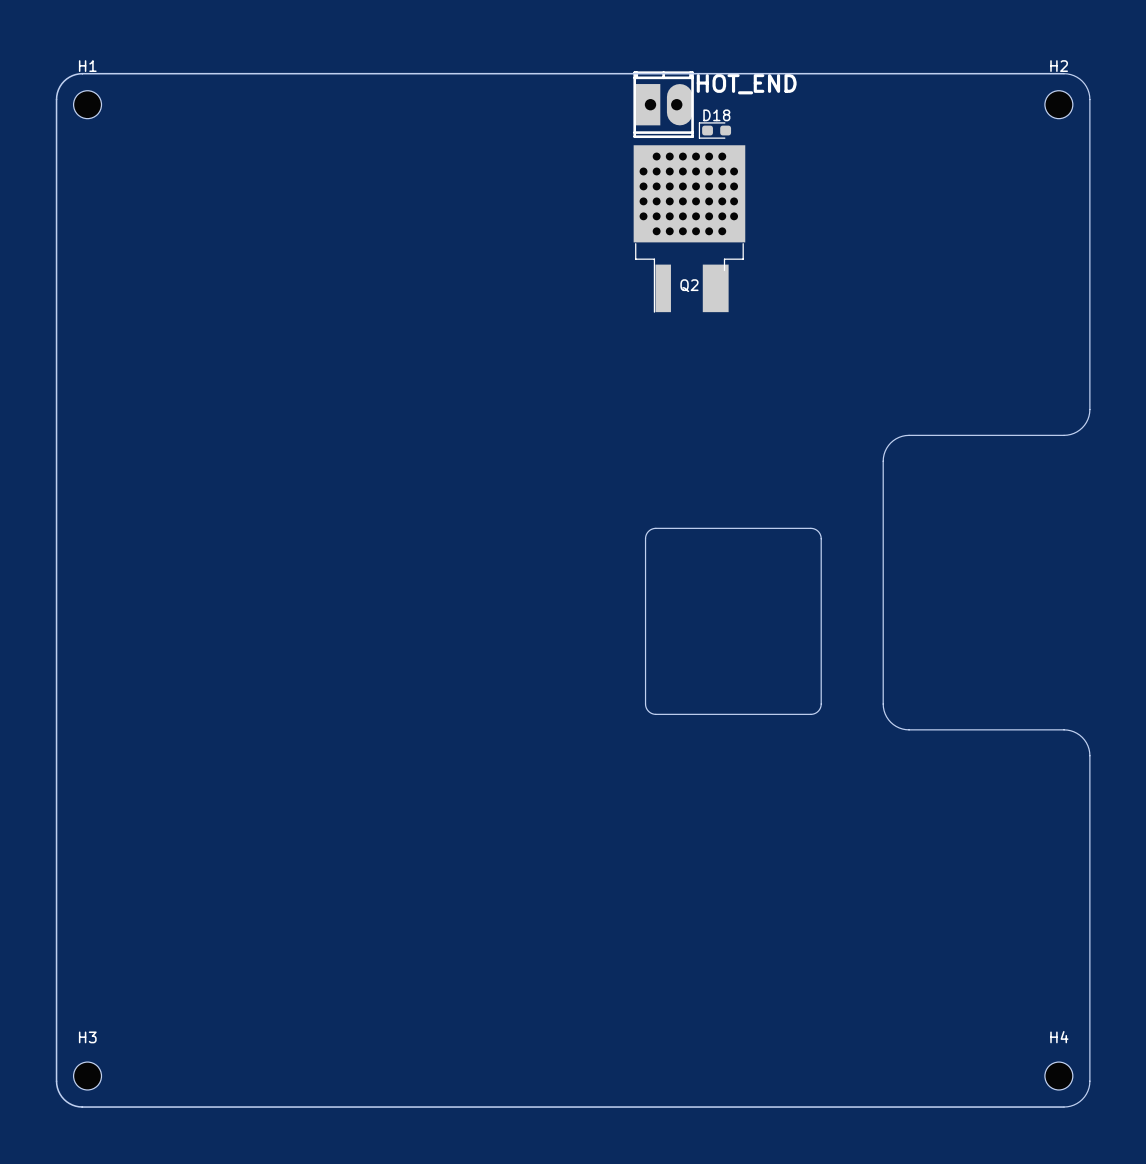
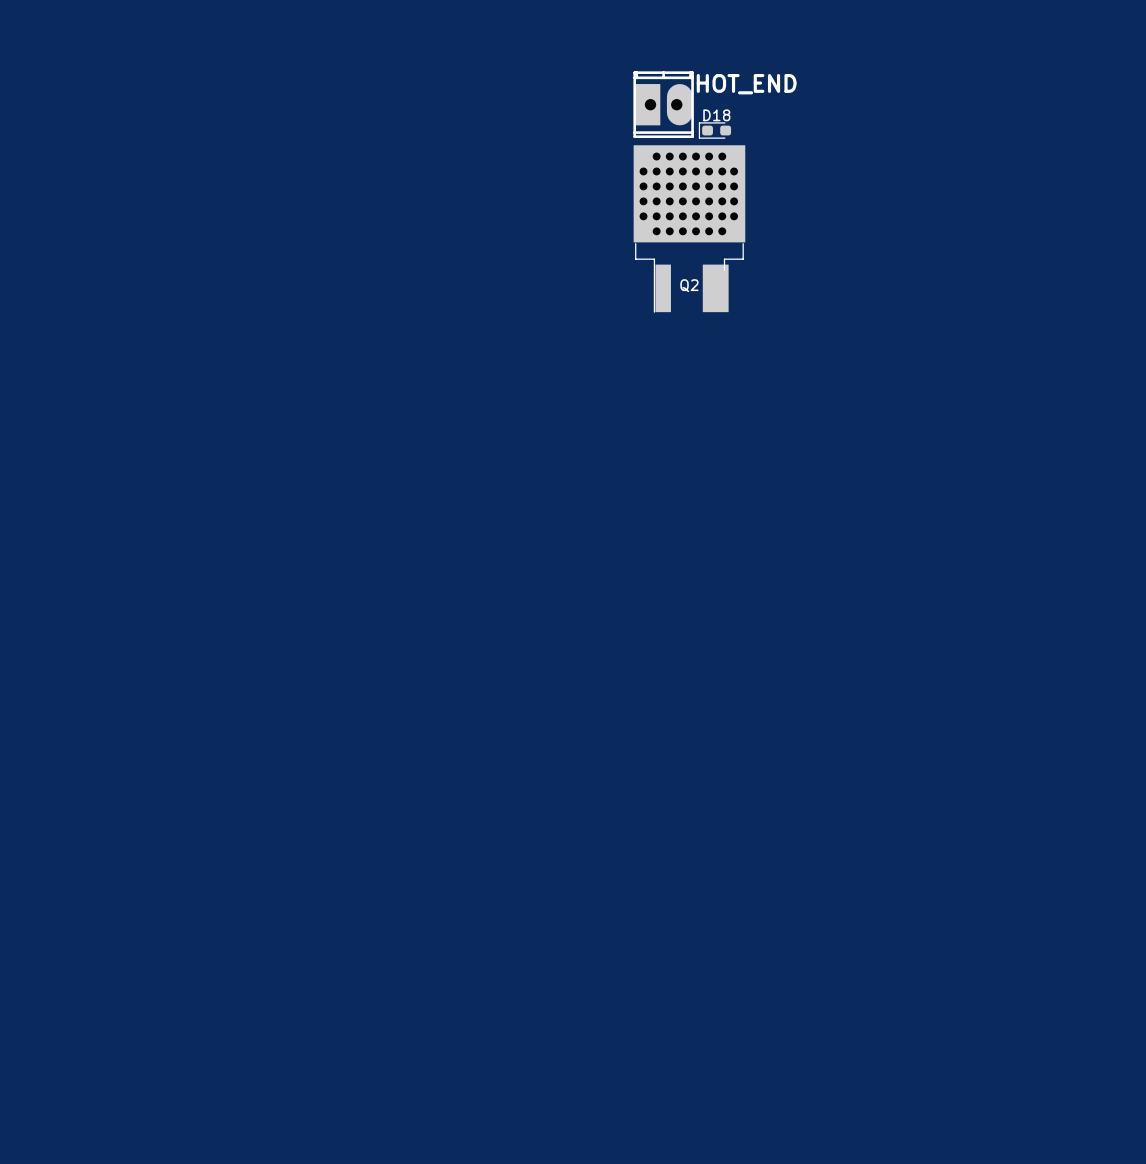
board edge: (82, 73) (1064, 73) (1073, 75) (1082, 81) (1087, 89) (1089, 99) (1089, 409) (1086, 422) (1076, 431) (1067, 435) (905, 435) (890, 442) (885, 451) (883, 461) (883, 704) (888, 719) (896, 726) (909, 729) (1067, 730) (1082, 737) (1088, 749) (1089, 1081) (1087, 1091) (1082, 1099) (1073, 1105) (1064, 1107) (82, 1107) (72, 1105) (64, 1099) (58, 1091) (56, 1081) (56, 99) (58, 89) (64, 81) (72, 75) (82, 73) -> none
H1: (87, 104) -> none
H2: (1058, 104) -> none
board edge: (655, 528) (810, 528) (818, 531) (821, 538) (821, 704) (818, 711) (810, 714) (655, 714) (648, 711) (645, 704) (645, 538) (648, 531) (655, 528) -> none
H3: (87, 1076) -> none
H4: (1058, 1076) -> none

